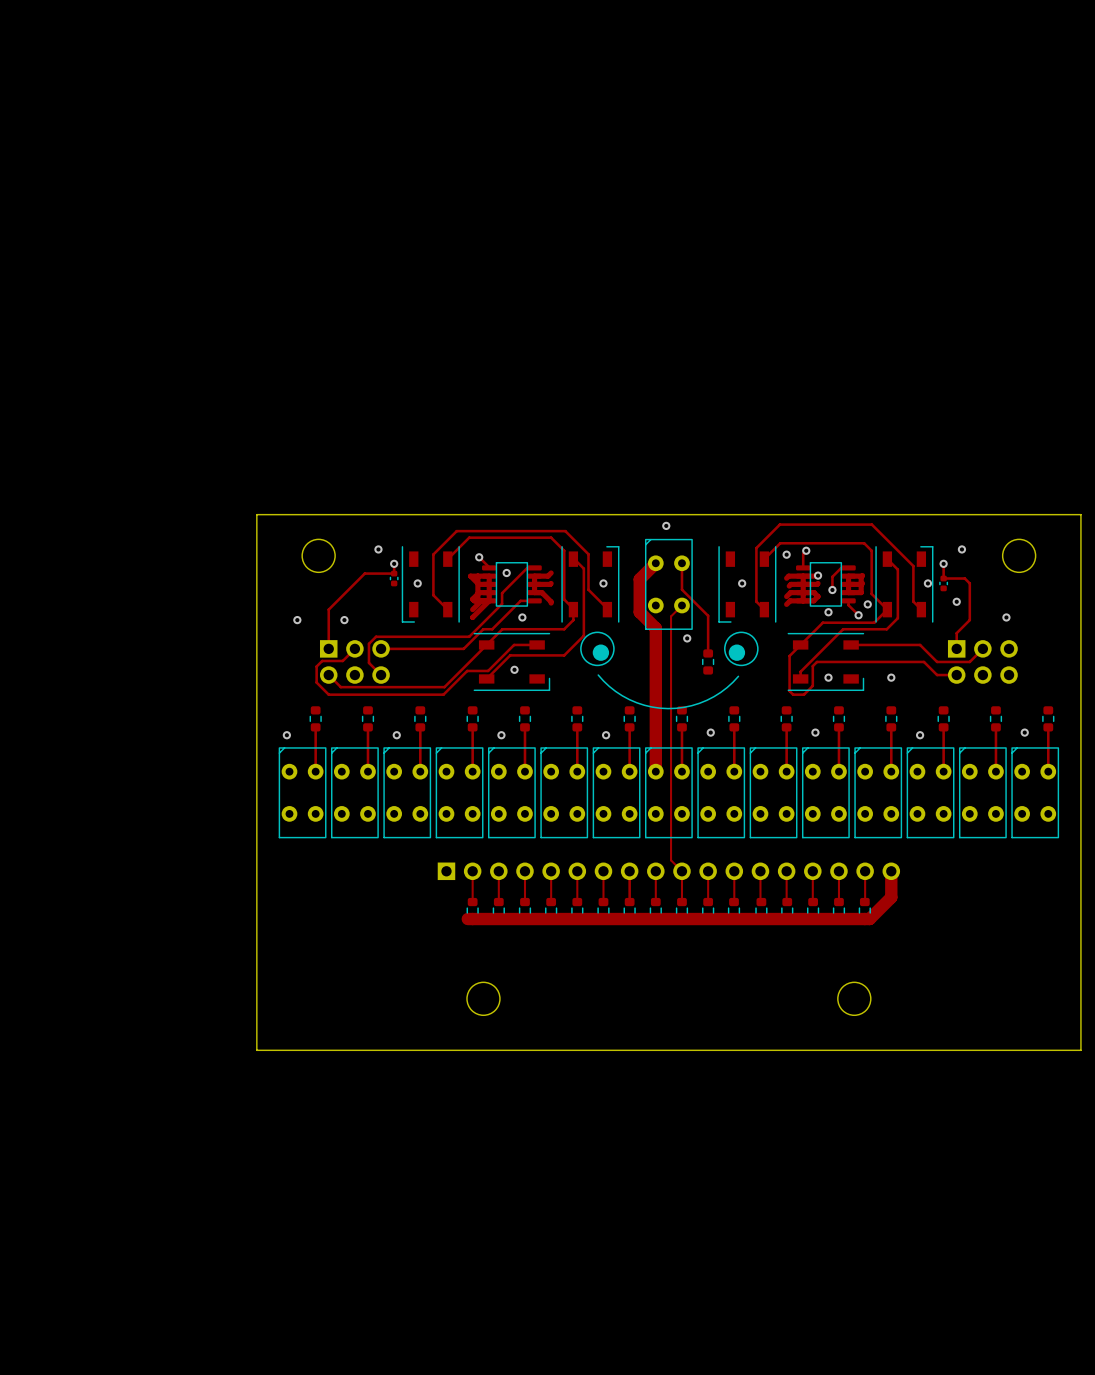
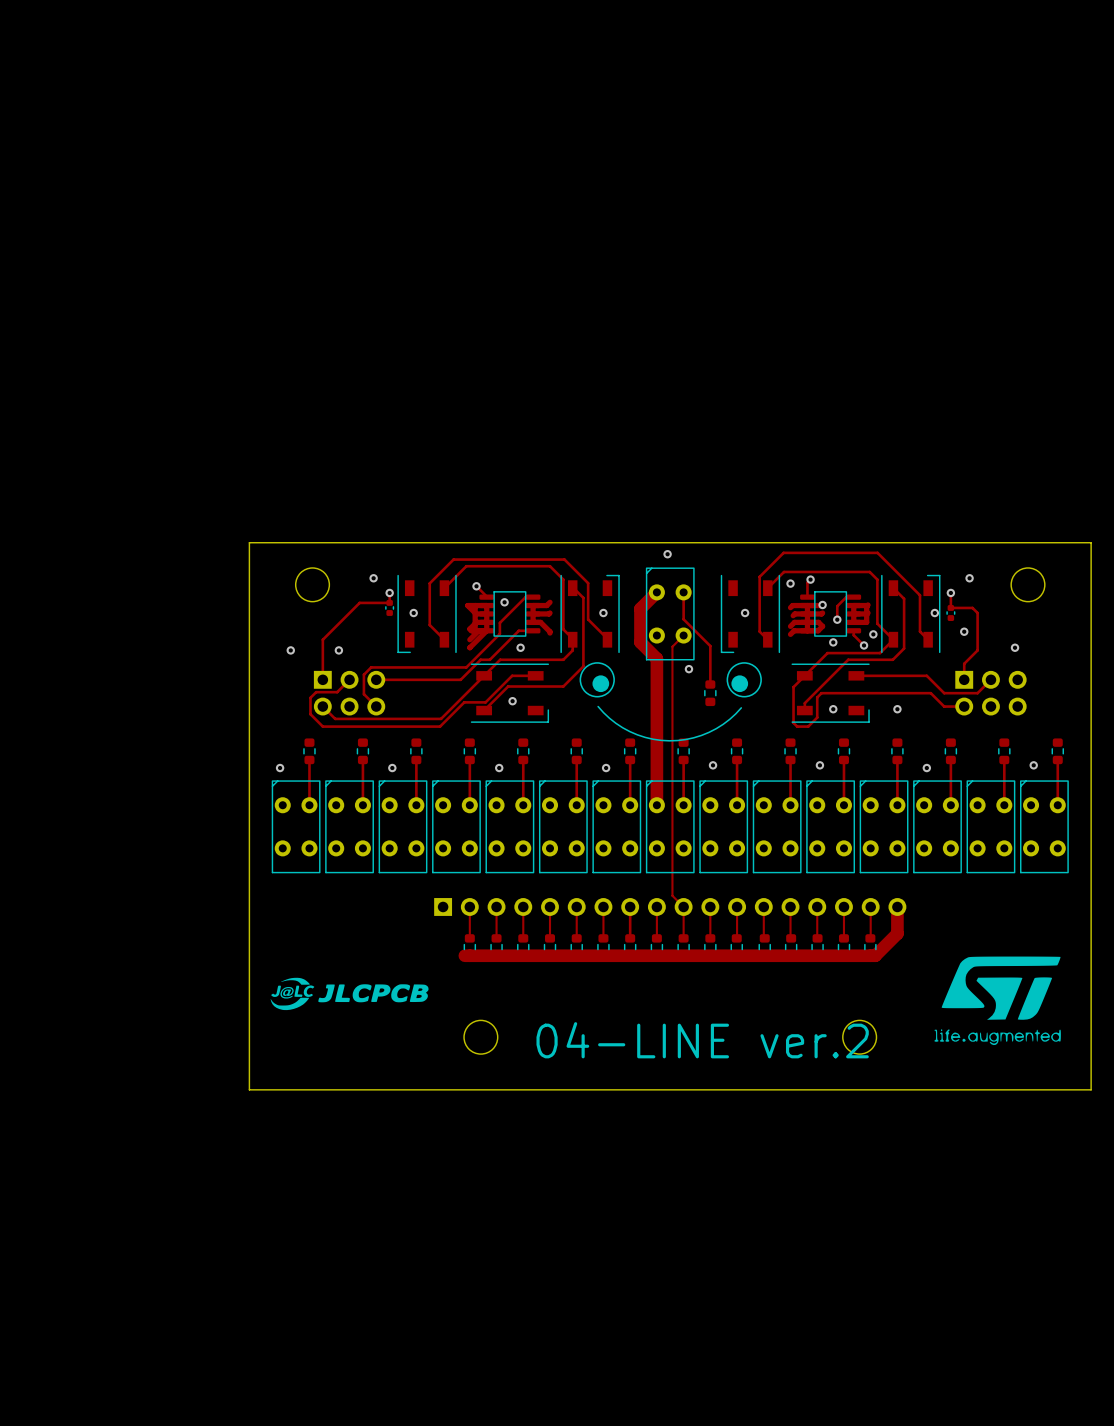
drawing: none -> [934, 956, 1061, 1046]
drawing: none -> [270, 977, 429, 1011]
text: none -> 04-LINE ver.2 (702, 1040)

